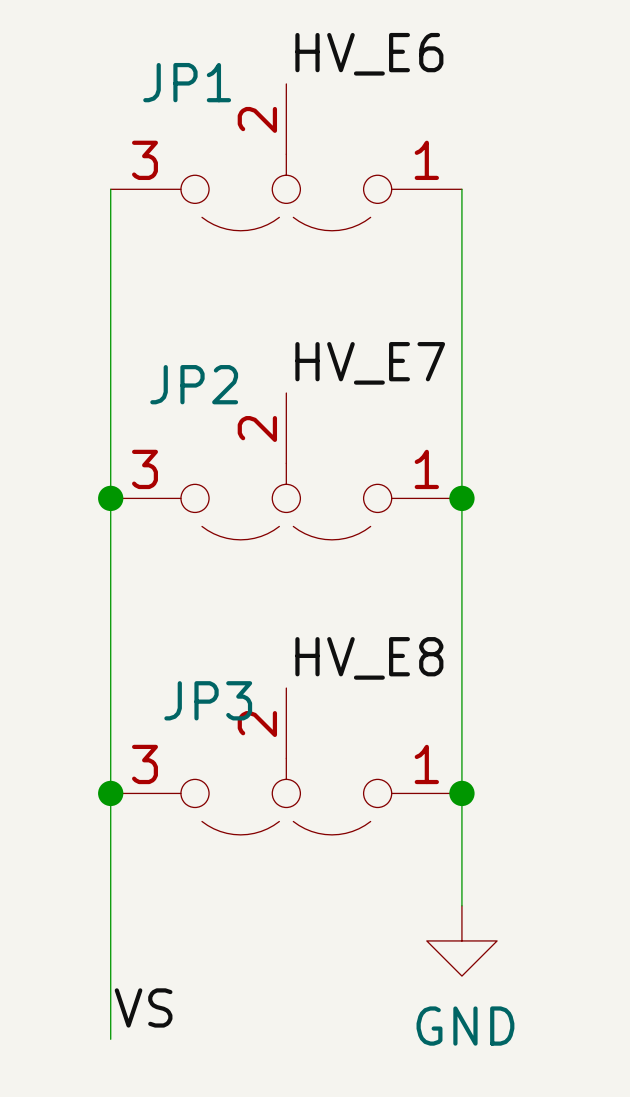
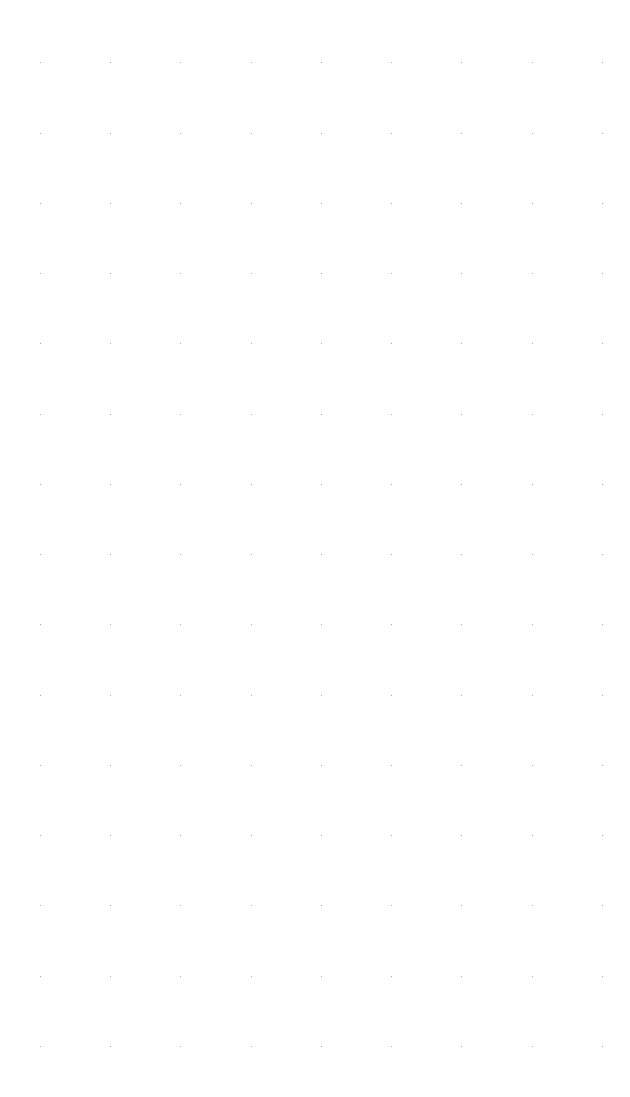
label: HV_E6 (369, 54) -> none
JP1: (286, 157) -> none
wire: (110, 189) (110, 1039) -> none
wire: (461, 189) (461, 905) -> none
label: HV_E7 (370, 363) -> none
JP2: (286, 466) -> none
junction: (110, 498) -> none
junction: (461, 498) -> none
label: HV_E8 (369, 658) -> none
JP3: (286, 761) -> none
junction: (110, 793) -> none
junction: (461, 793) -> none
power symbol: GND (461, 940) -> none
label: VS (143, 1007) -> none

